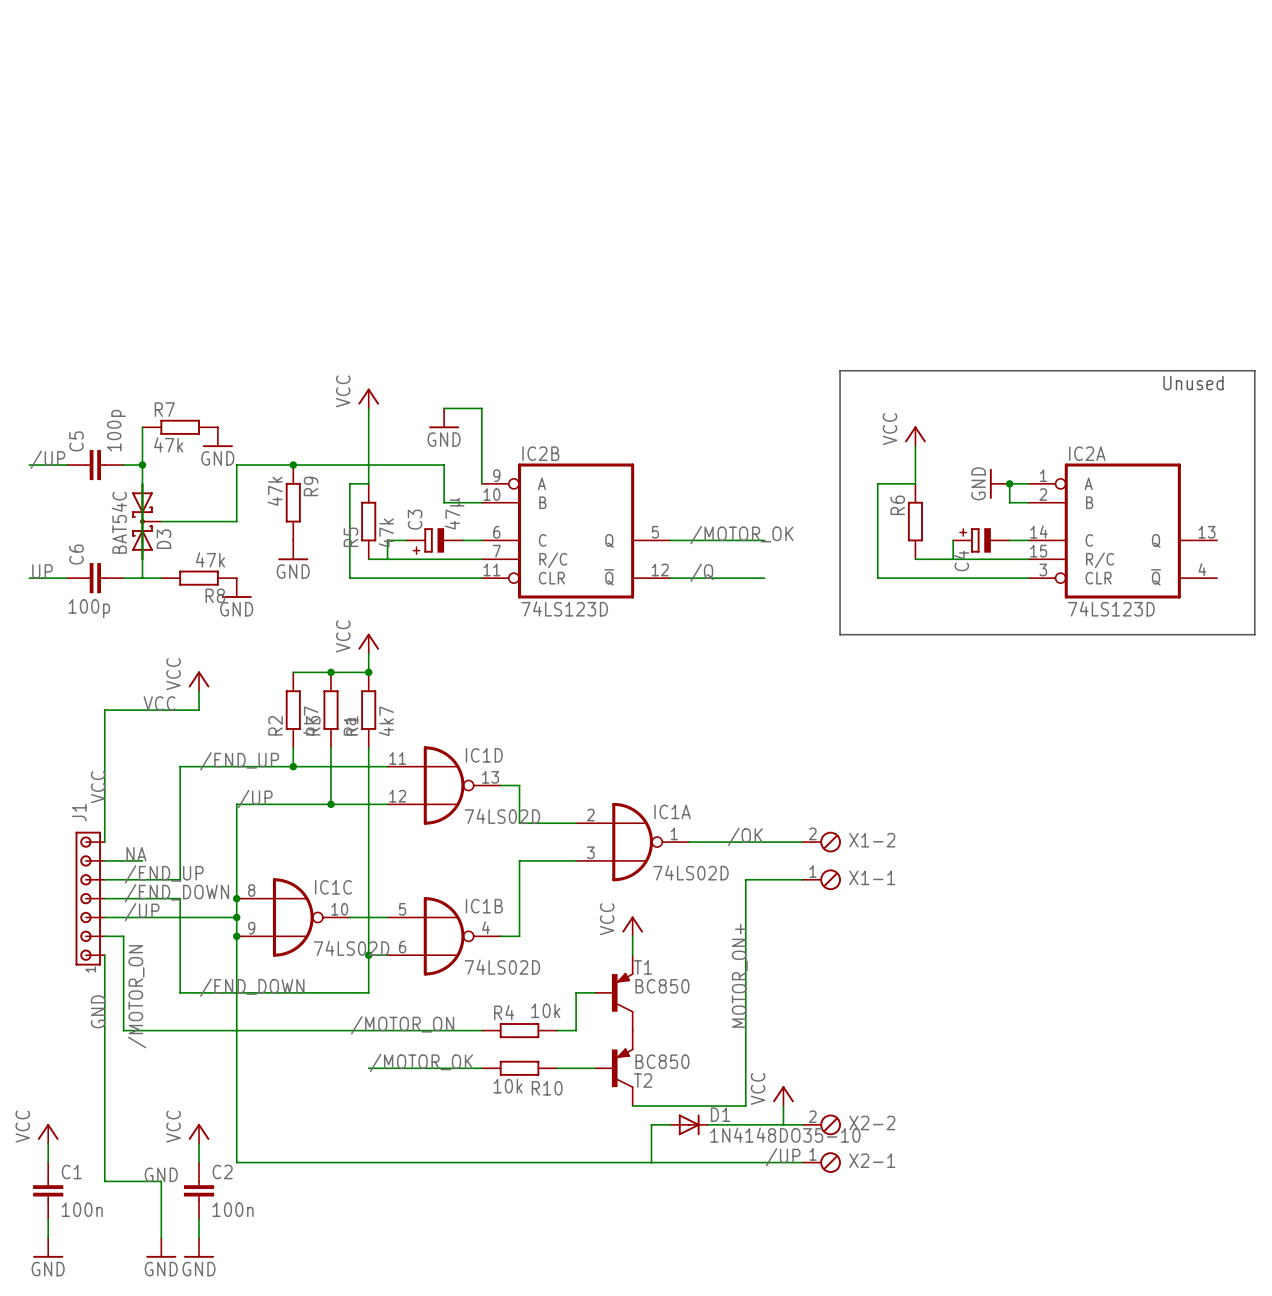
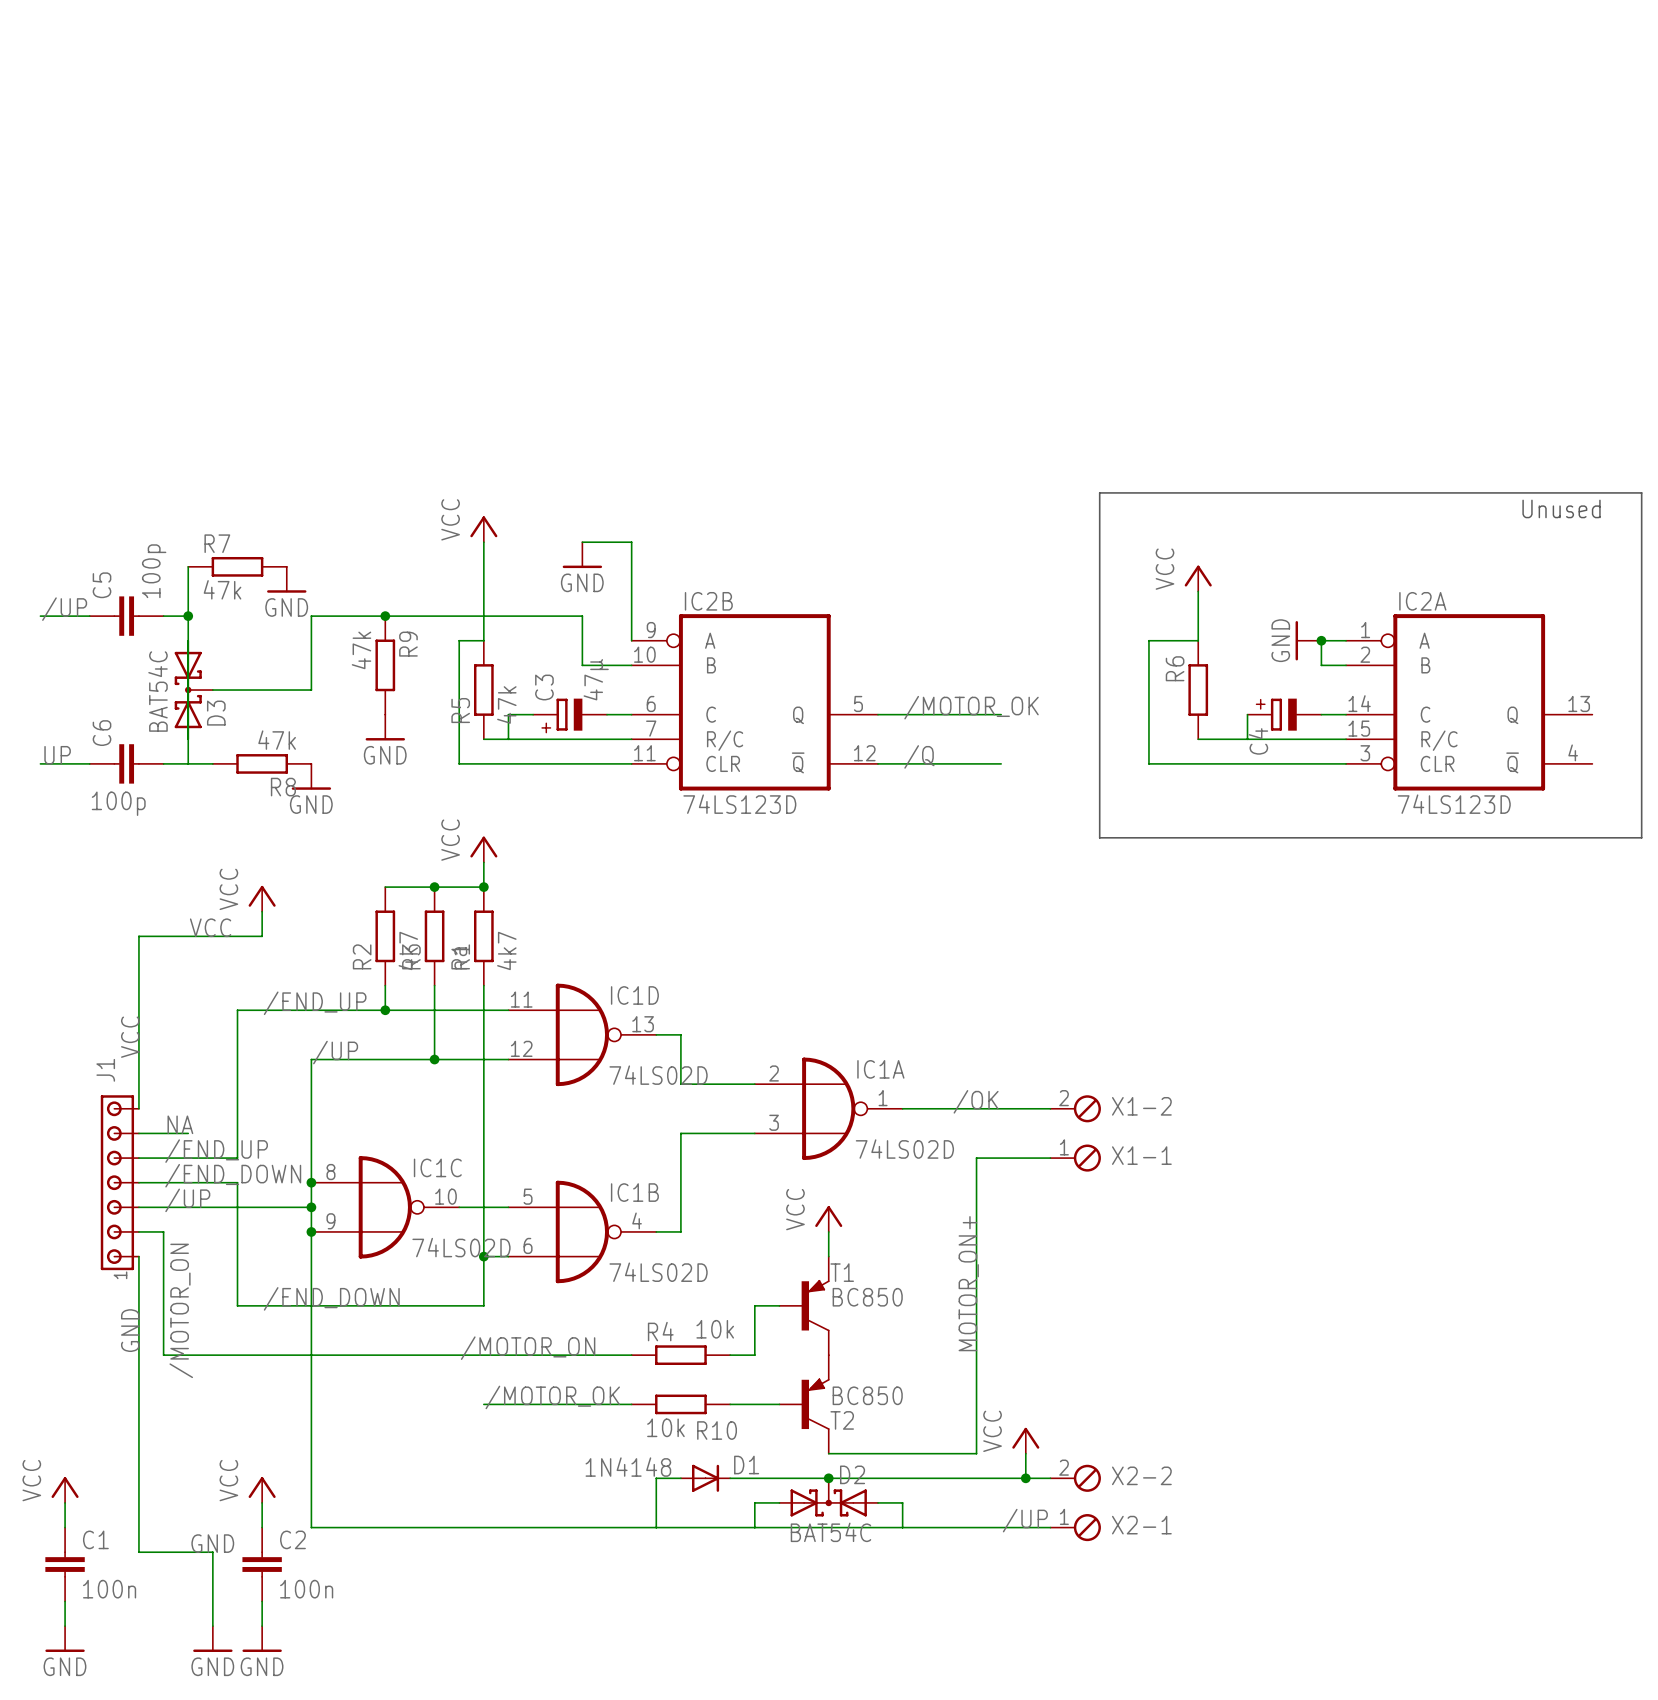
wire: none -> (680, 1478) (656, 1478) (656, 1527)
junction: none -> (828, 1478)
wire: (651, 1124) (651, 1162) -> (853, 1478) (730, 1478)
D1 position: (689, 1124) -> (705, 1478)
junction: none -> (1025, 1478)
D1 value: 1N4148DO35-10 (785, 1135) -> 1N4148 (628, 1467)
D2: none -> BAT54C (828, 1497)
wire: none -> (779, 1502) (754, 1502) (754, 1527)
wire: none -> (877, 1502) (902, 1502) (902, 1527)

